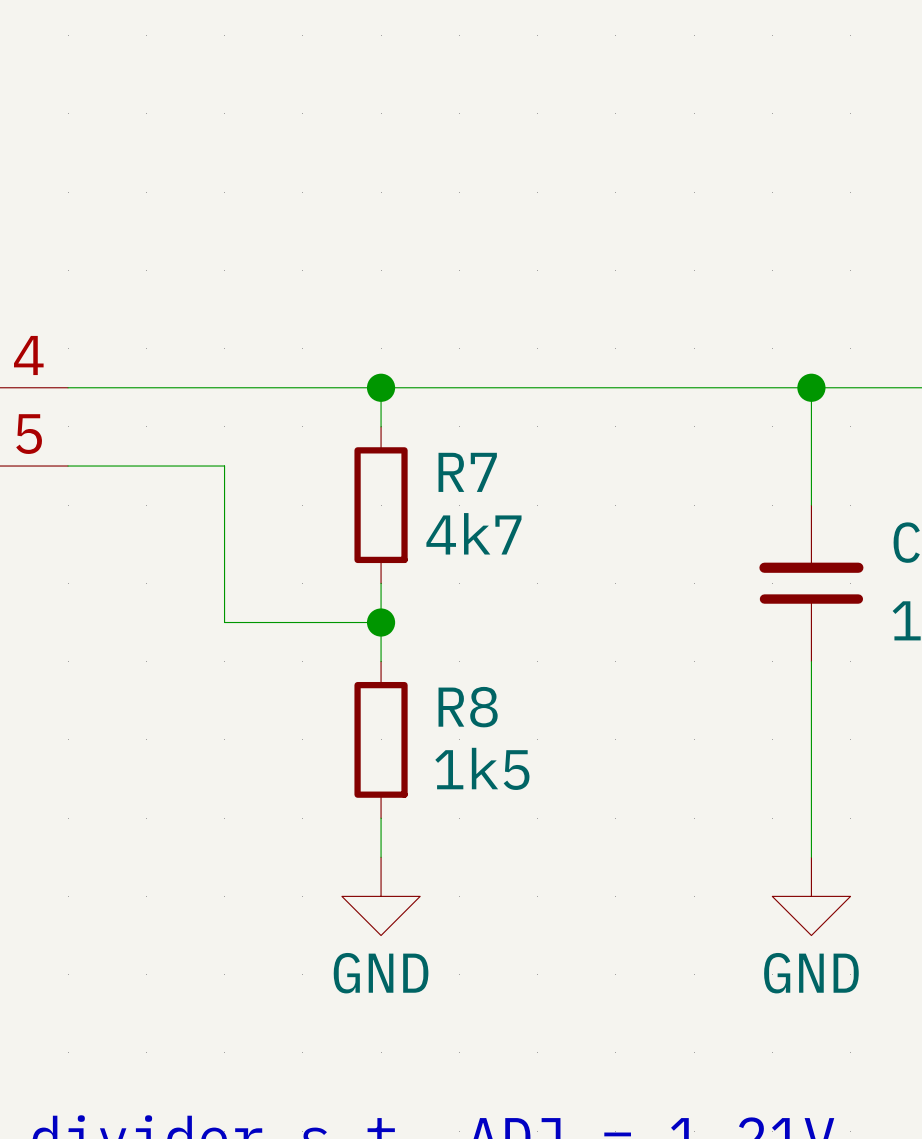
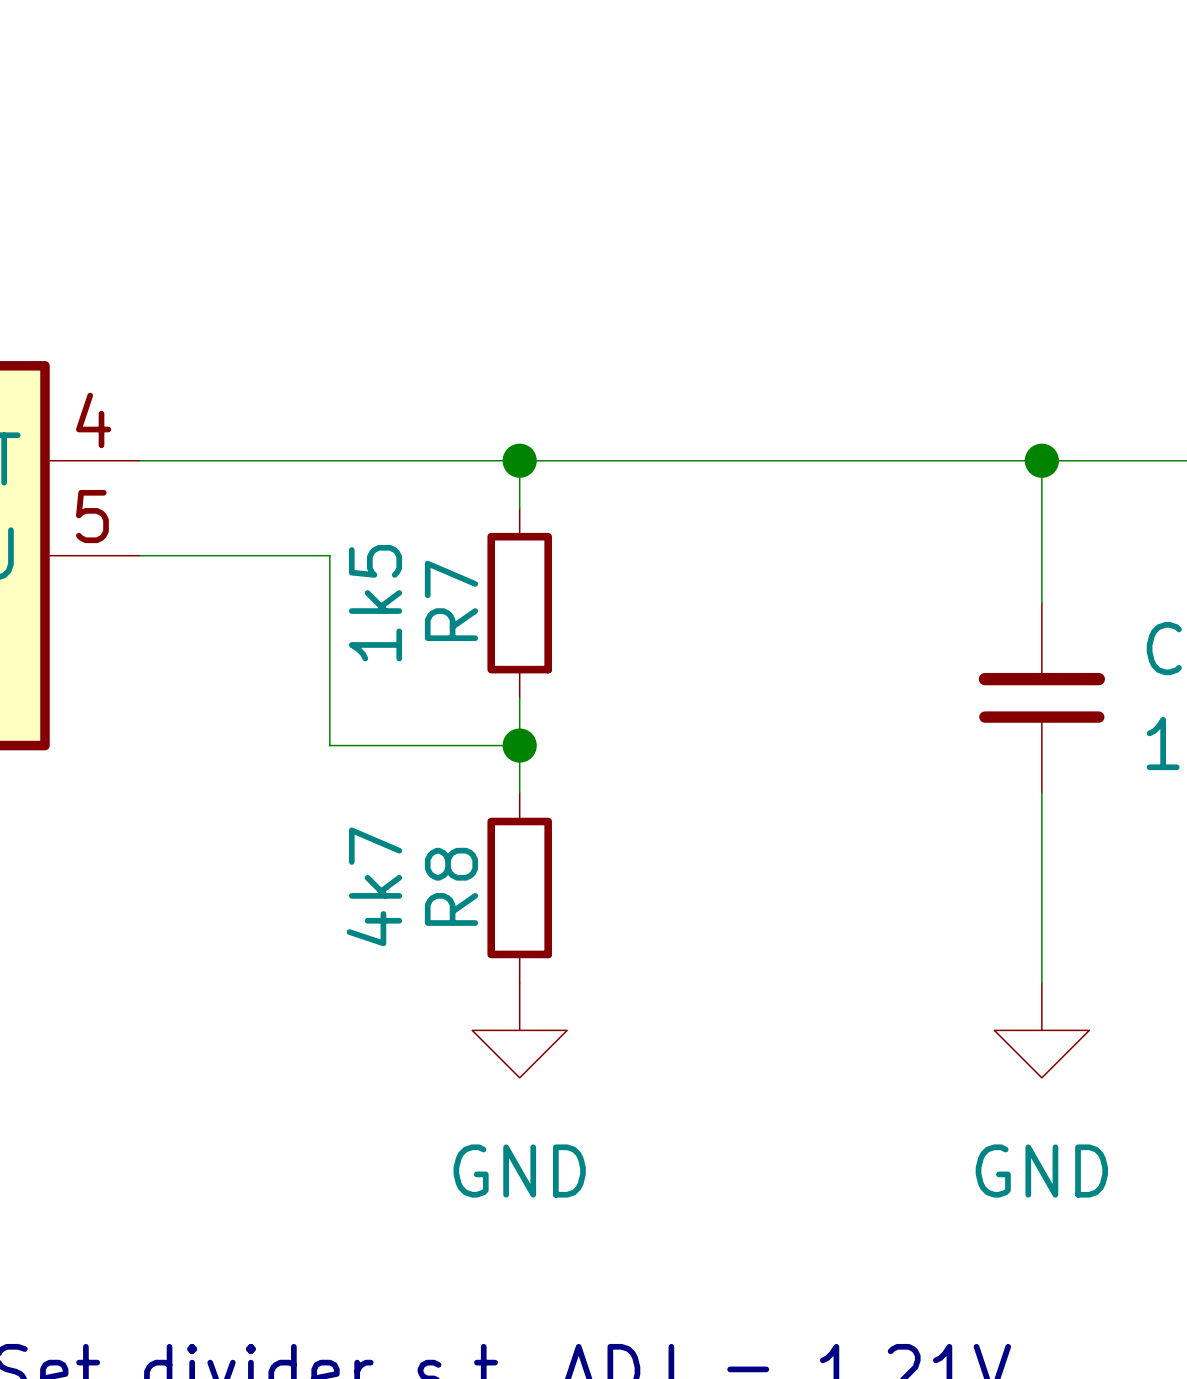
R7 name rotation: 0° (467, 472) -> 90° counterclockwise (451, 600)
R7 name position: R7 (467, 472) -> R7 (451, 600)
R7 value: 4k7 (473, 533) -> 1k5 (375, 603)
R8 name rotation: 0° (468, 707) -> 90° counterclockwise (451, 886)
R8 name position: R8 (468, 707) -> R8 (451, 886)
R8 value: 1k5 (482, 768) -> 4k7 (374, 886)
power symbol position: GND (381, 896) -> GND (519, 1030)
power symbol position: GND (811, 896) -> GND (1041, 1030)

